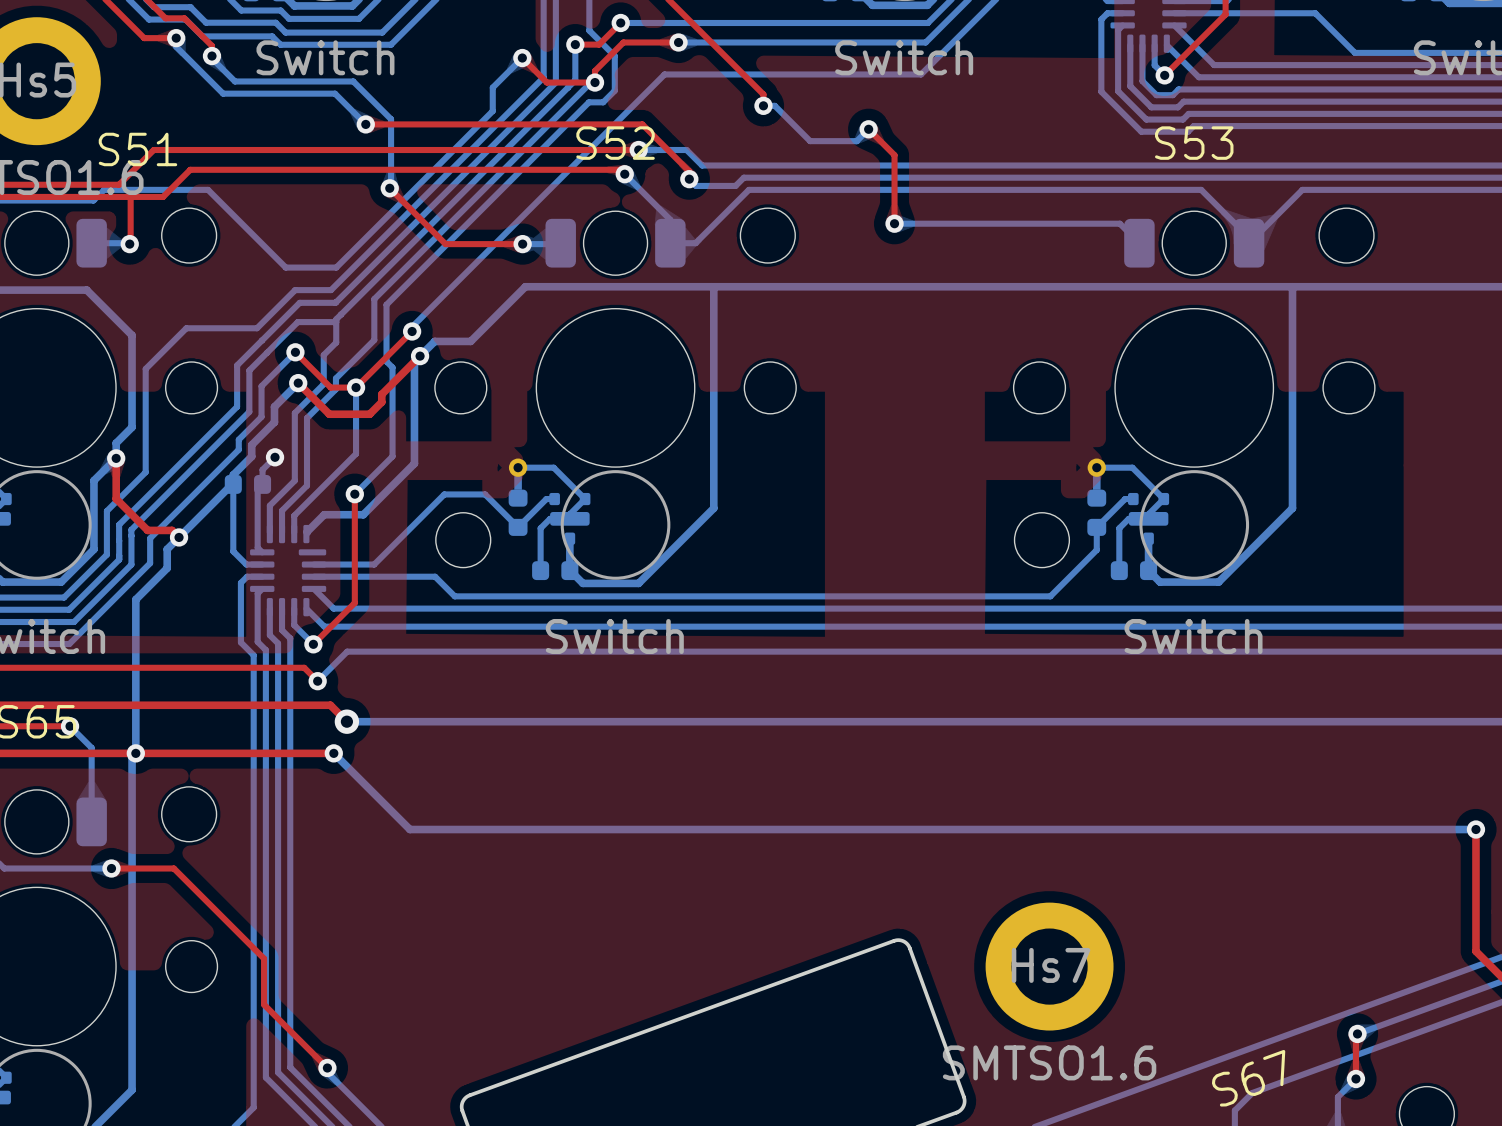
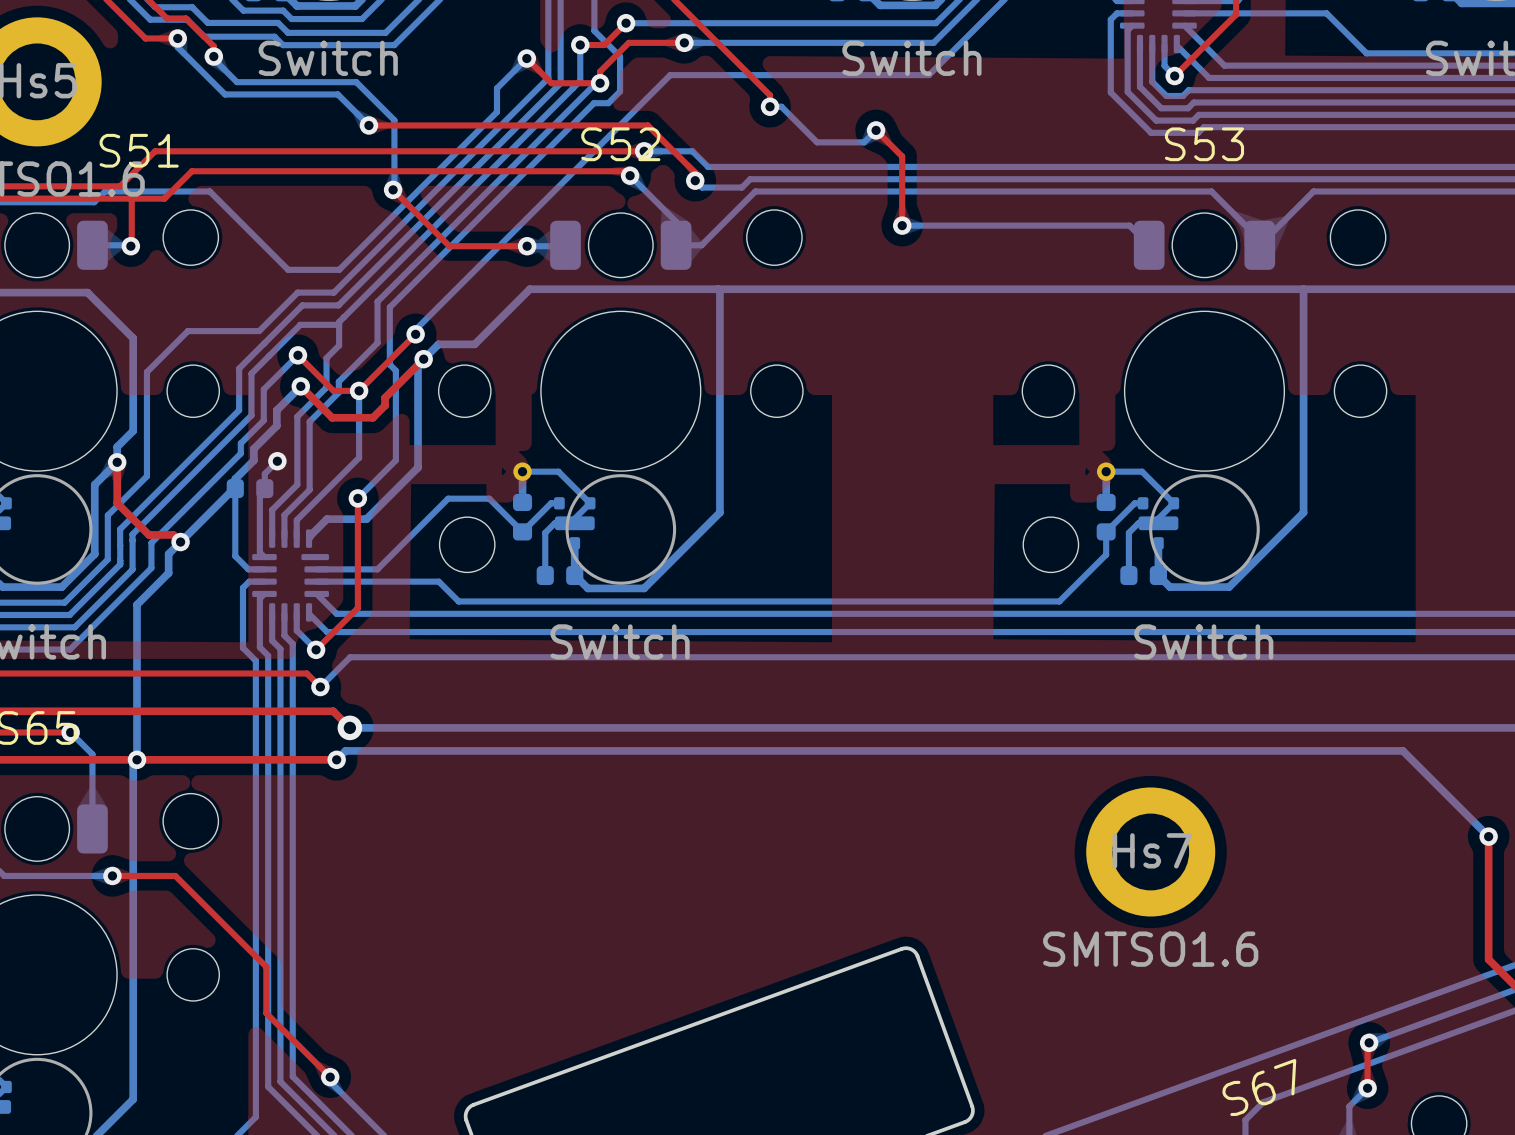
bottom track: (333, 753) (409, 829) (1475, 829) -> (336, 759) (345, 750) (1402, 750) (1488, 836)
Hs7 position: (1049, 966) -> (1150, 851)

